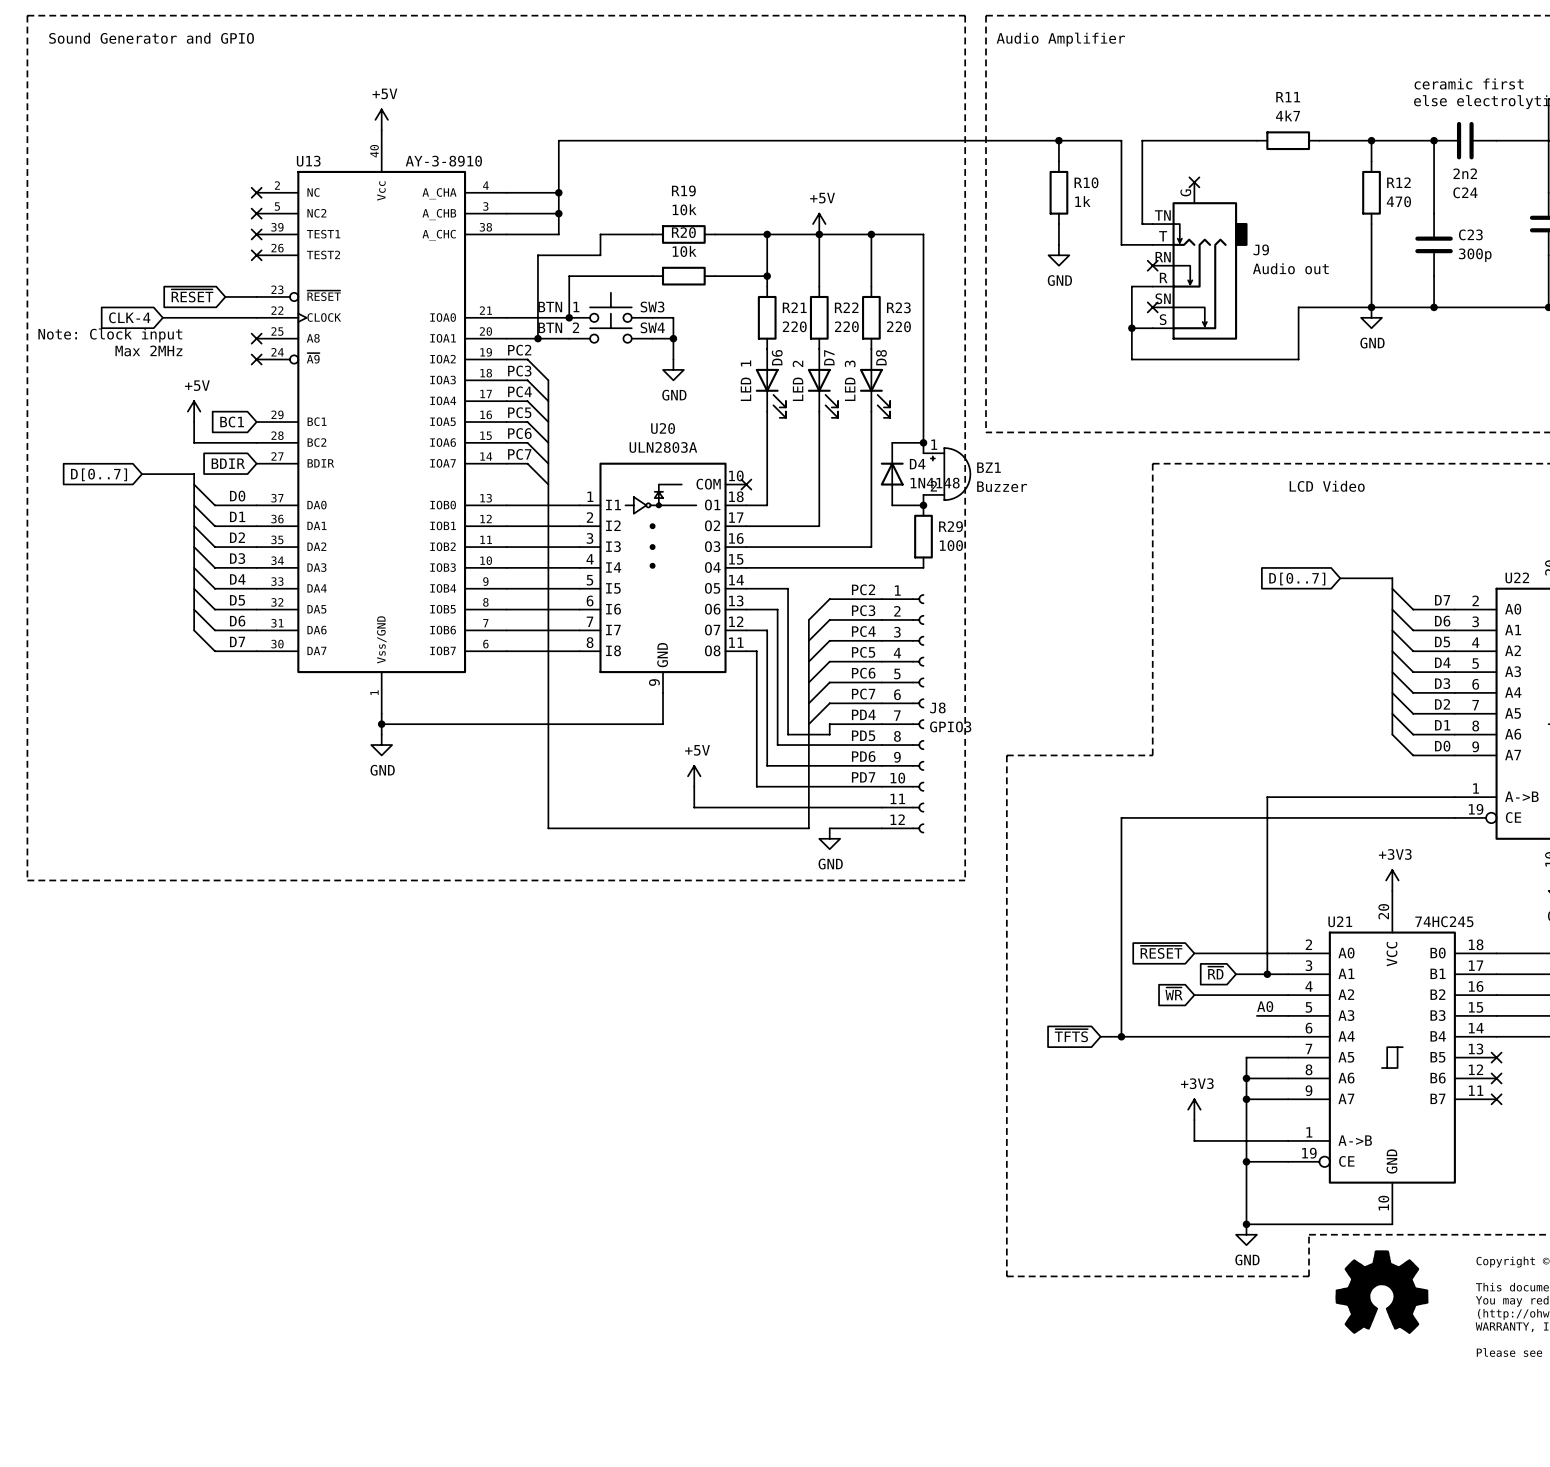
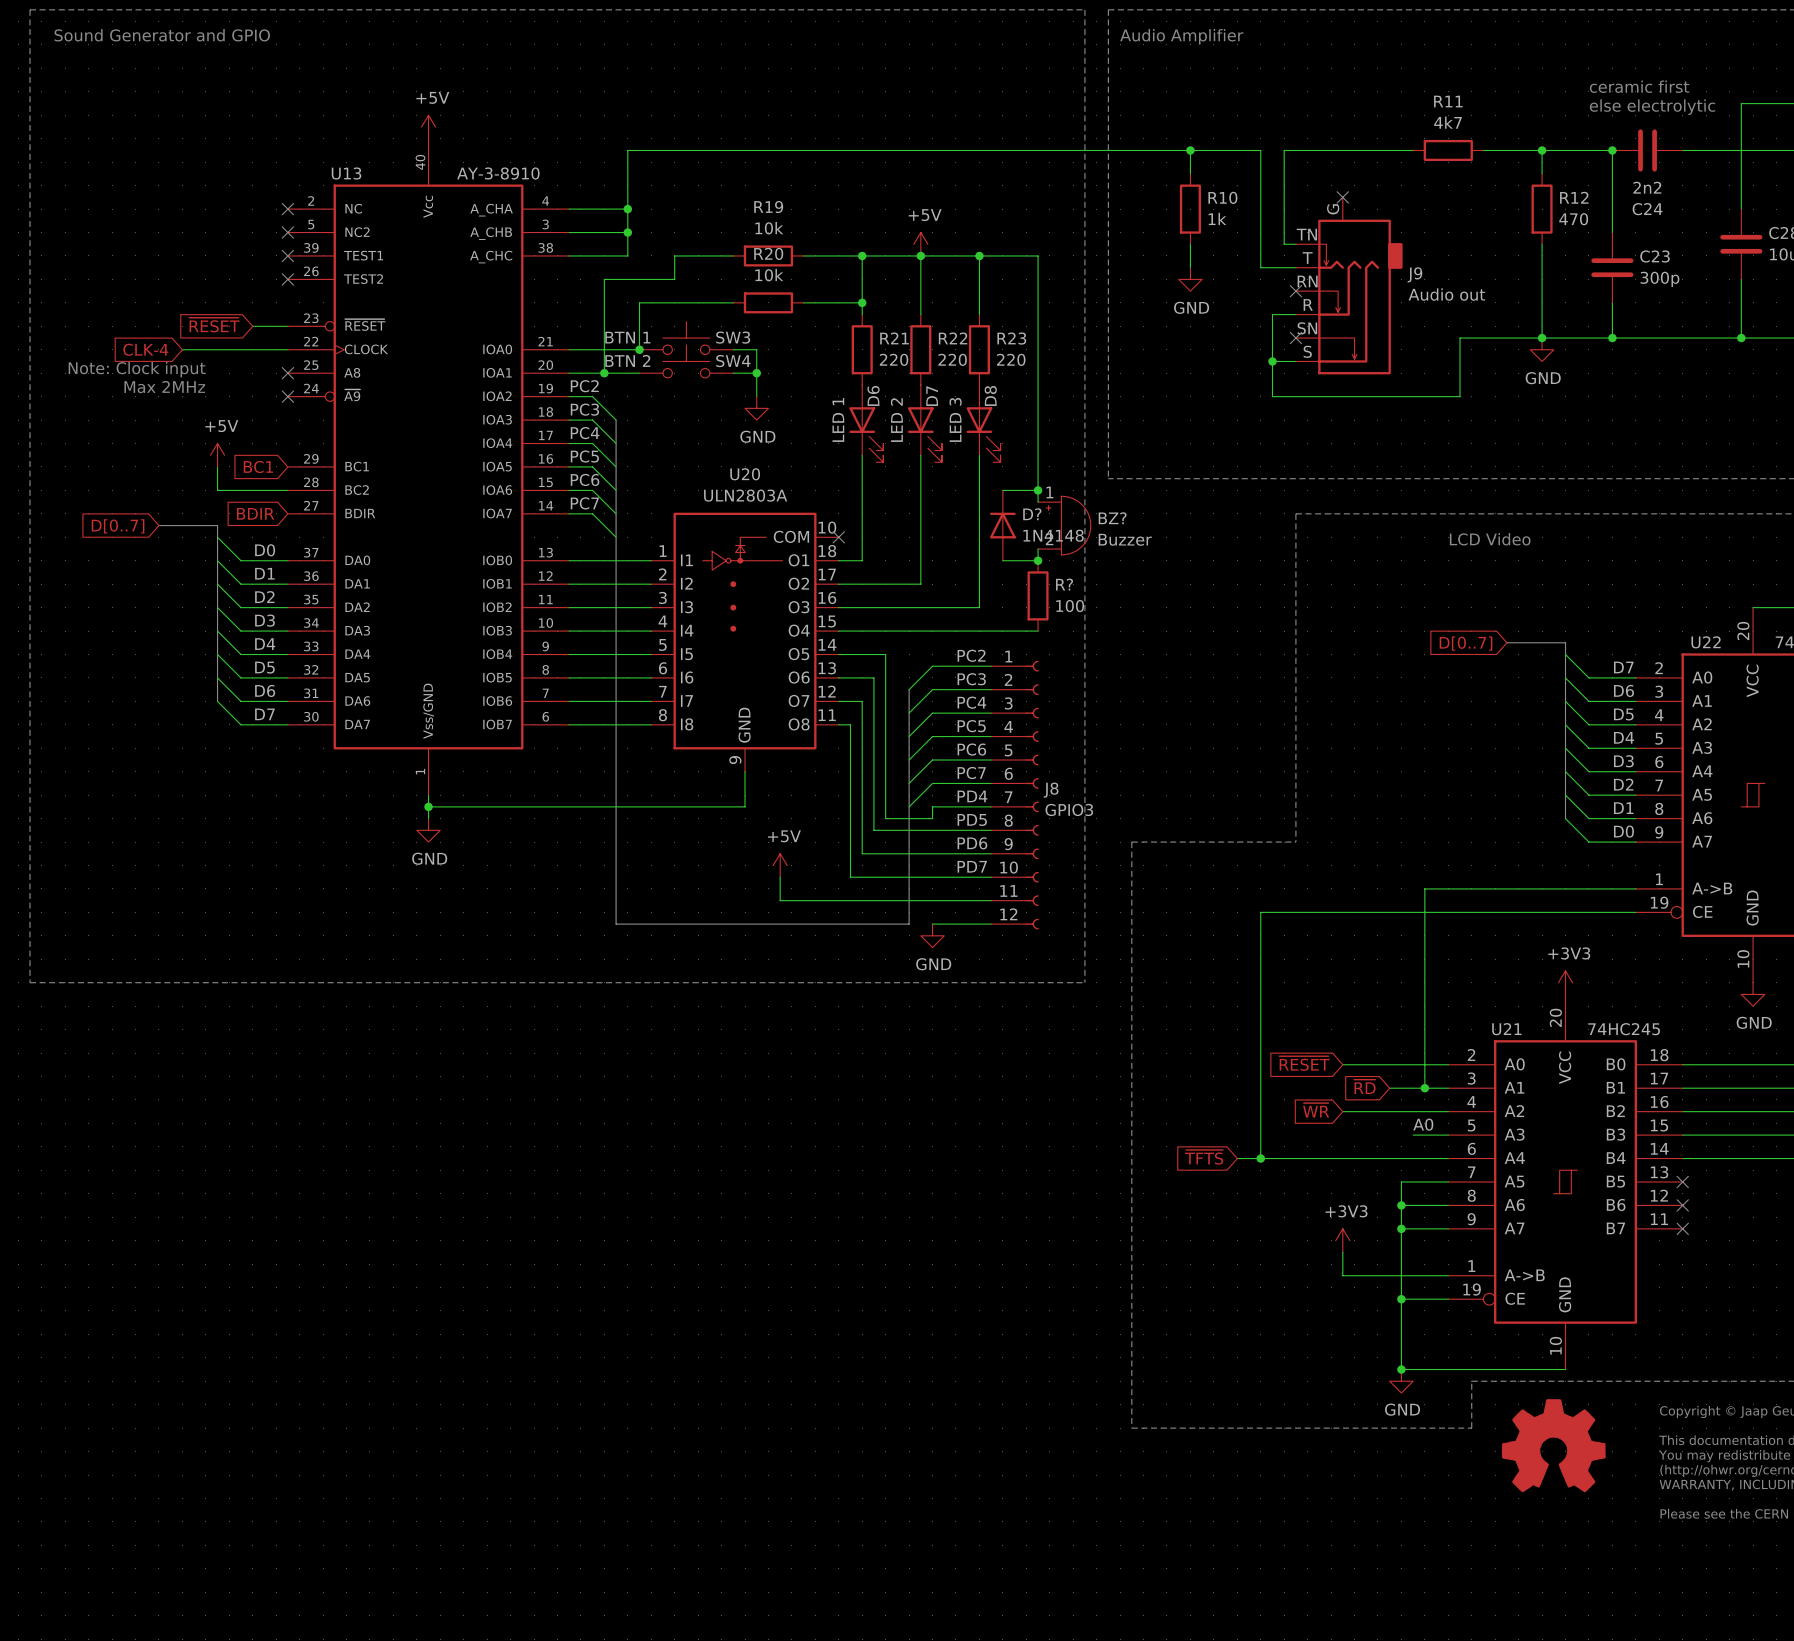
D4 name: D4 (917, 464) -> D? (1032, 514)
BZ1 name: BZ1 (989, 467) -> BZ? (1112, 518)
R29 name: R29 (951, 526) -> R? (1064, 584)

